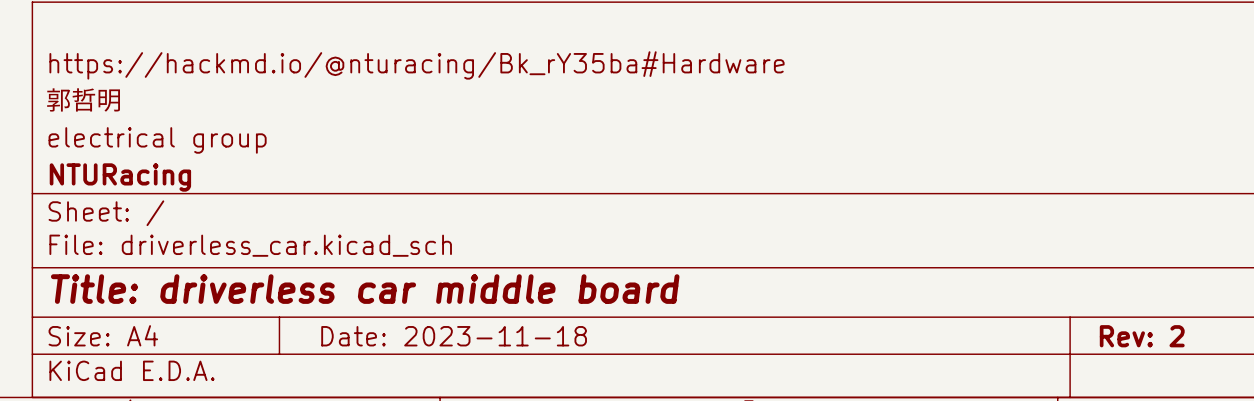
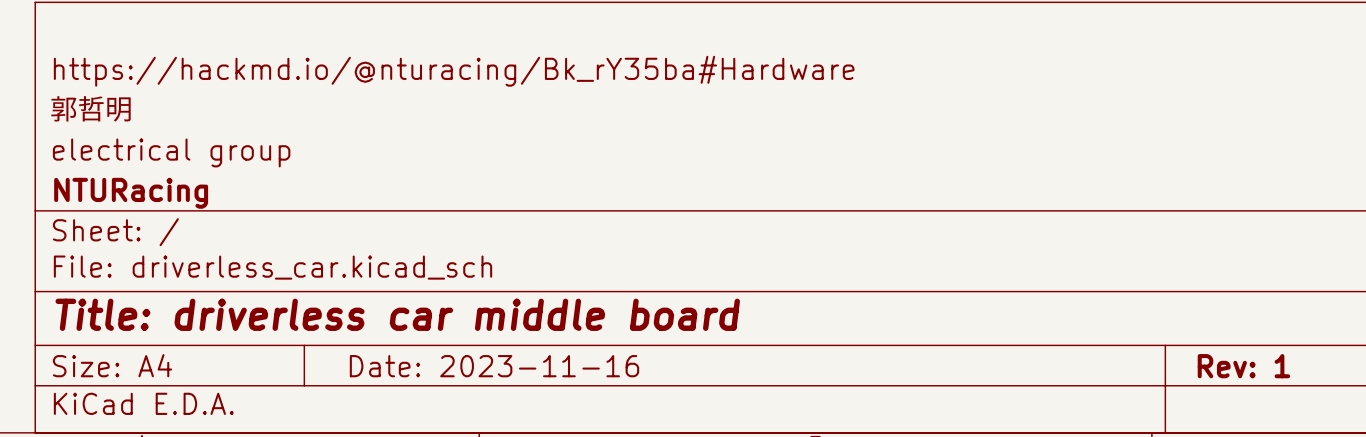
title block: Date: 2023-11-18 (454, 336) -> Date: 2023-11-16 (494, 366)
title block: Rev: 2 (1142, 336) -> Rev: 1 (1243, 366)

